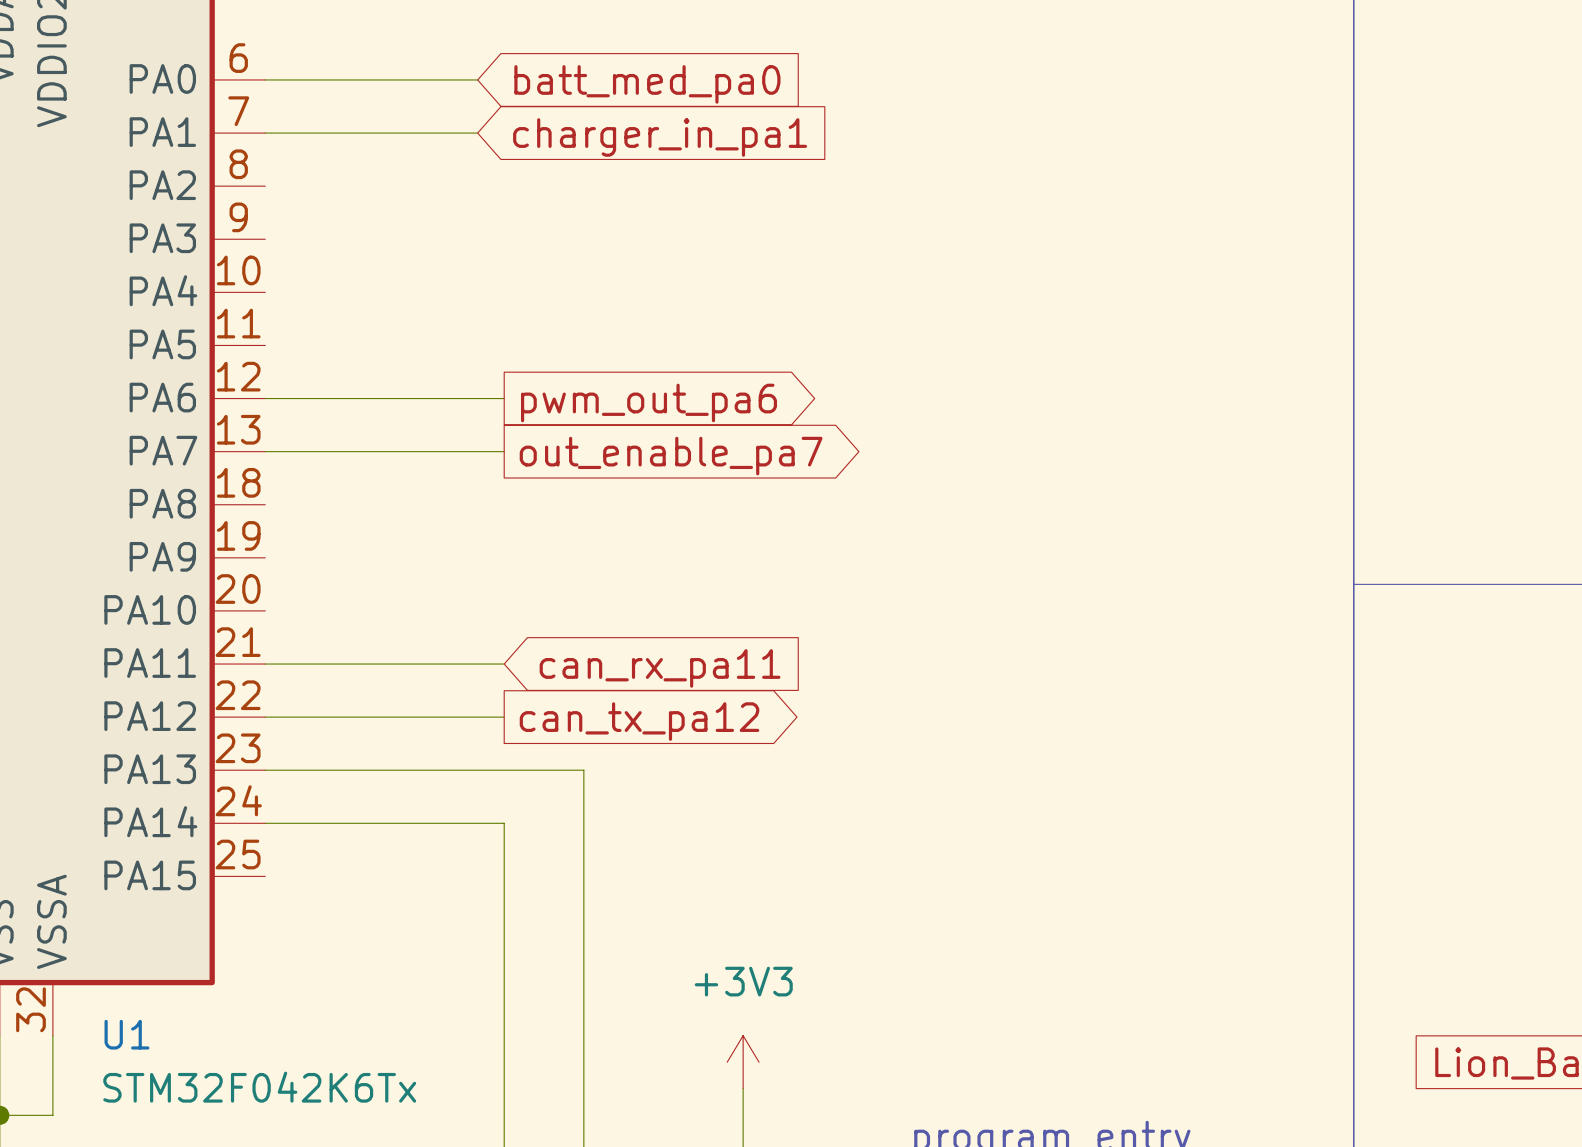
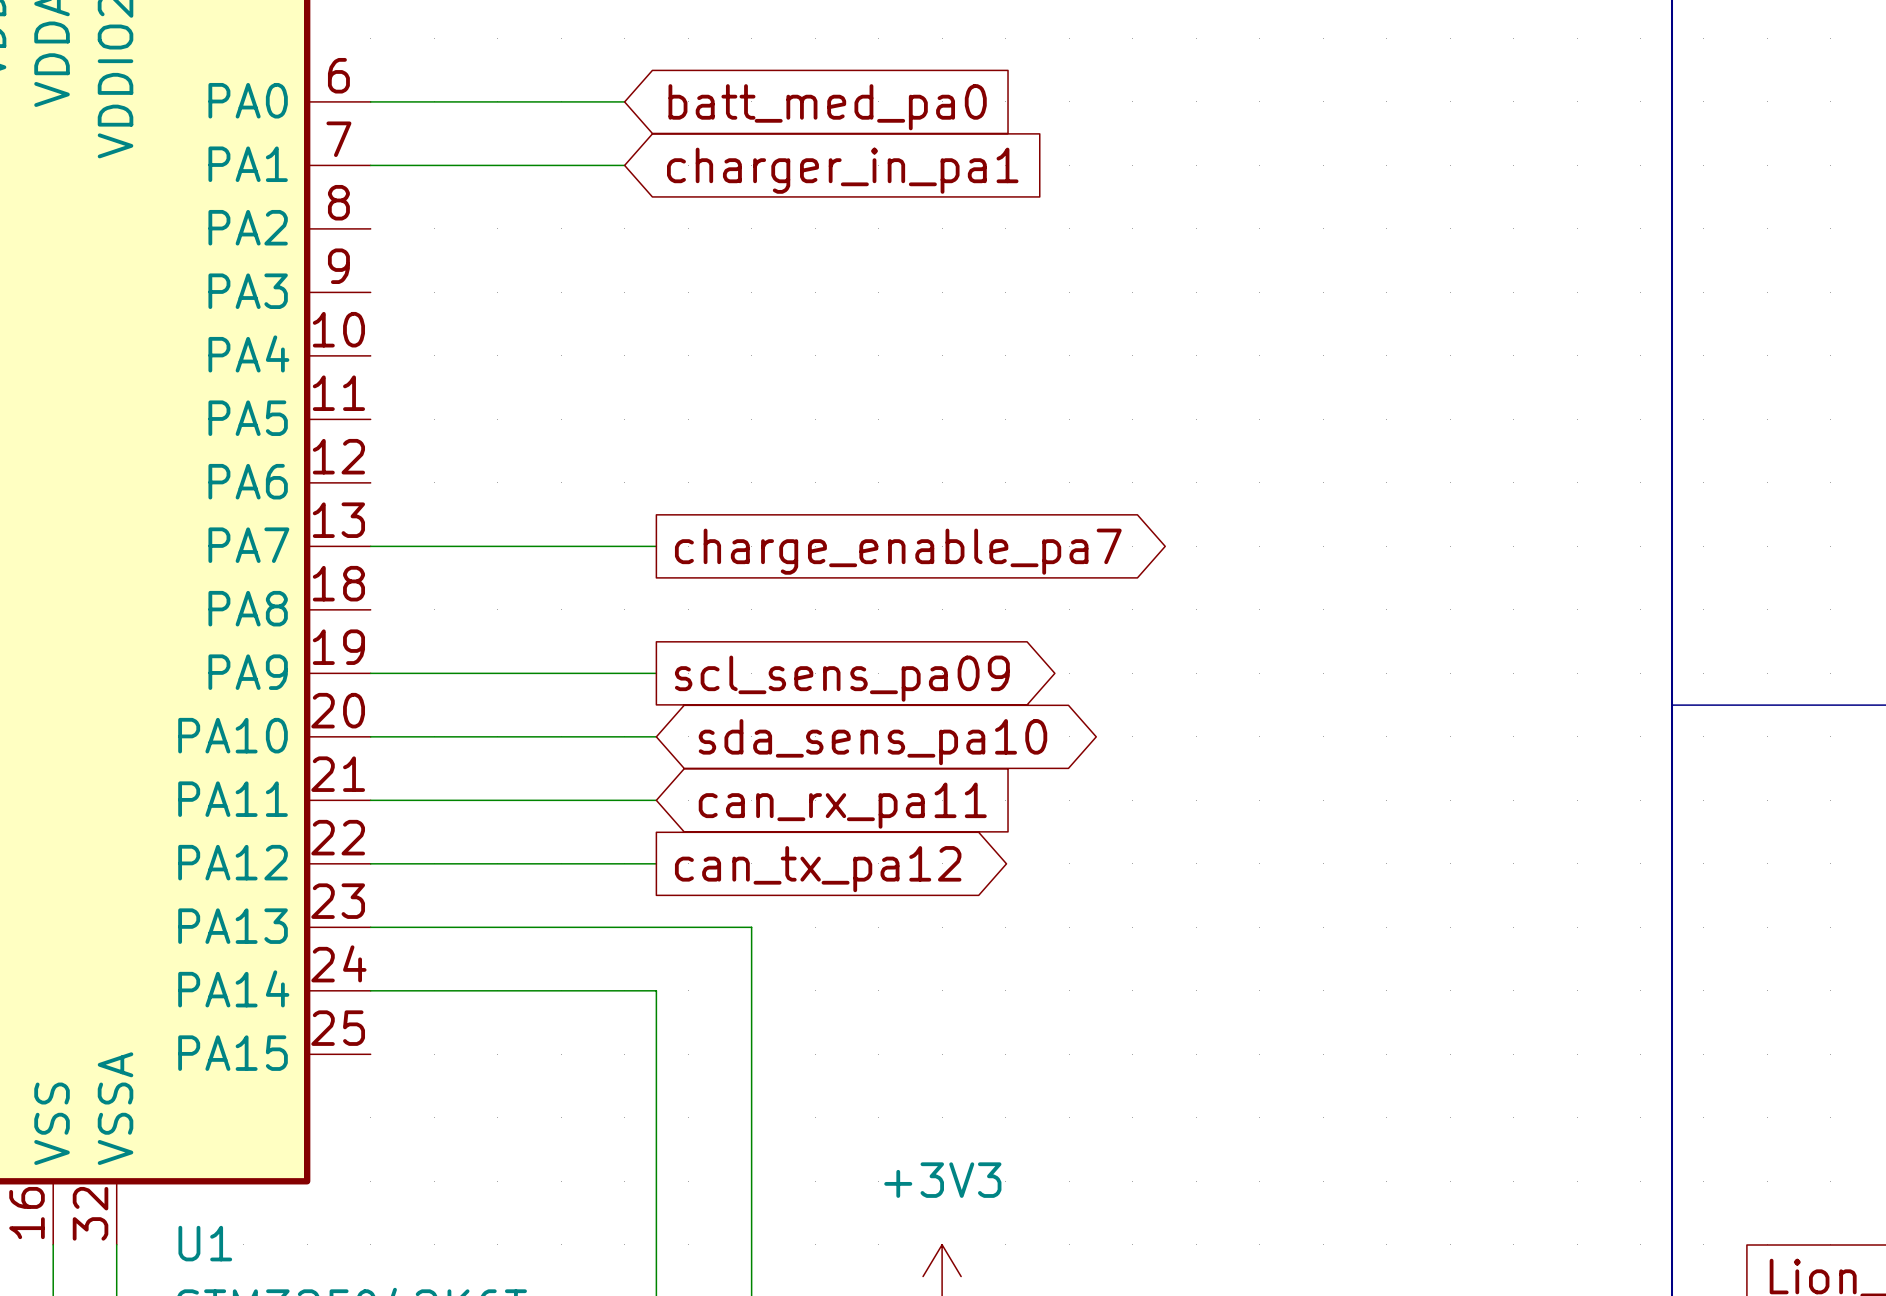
wire: (265, 398) (504, 398) -> (370, 673) (656, 673)
global label: pwm_out_pa6 (648, 402) -> none
global label: out_enable_pa7 (671, 456) -> charge_enable_pa7 (898, 551)
global label: none -> scl_sens_pa09 (842, 678)
wire: none -> (370, 736) (656, 736)
global label: none -> sda_sens_pa10 (872, 742)

